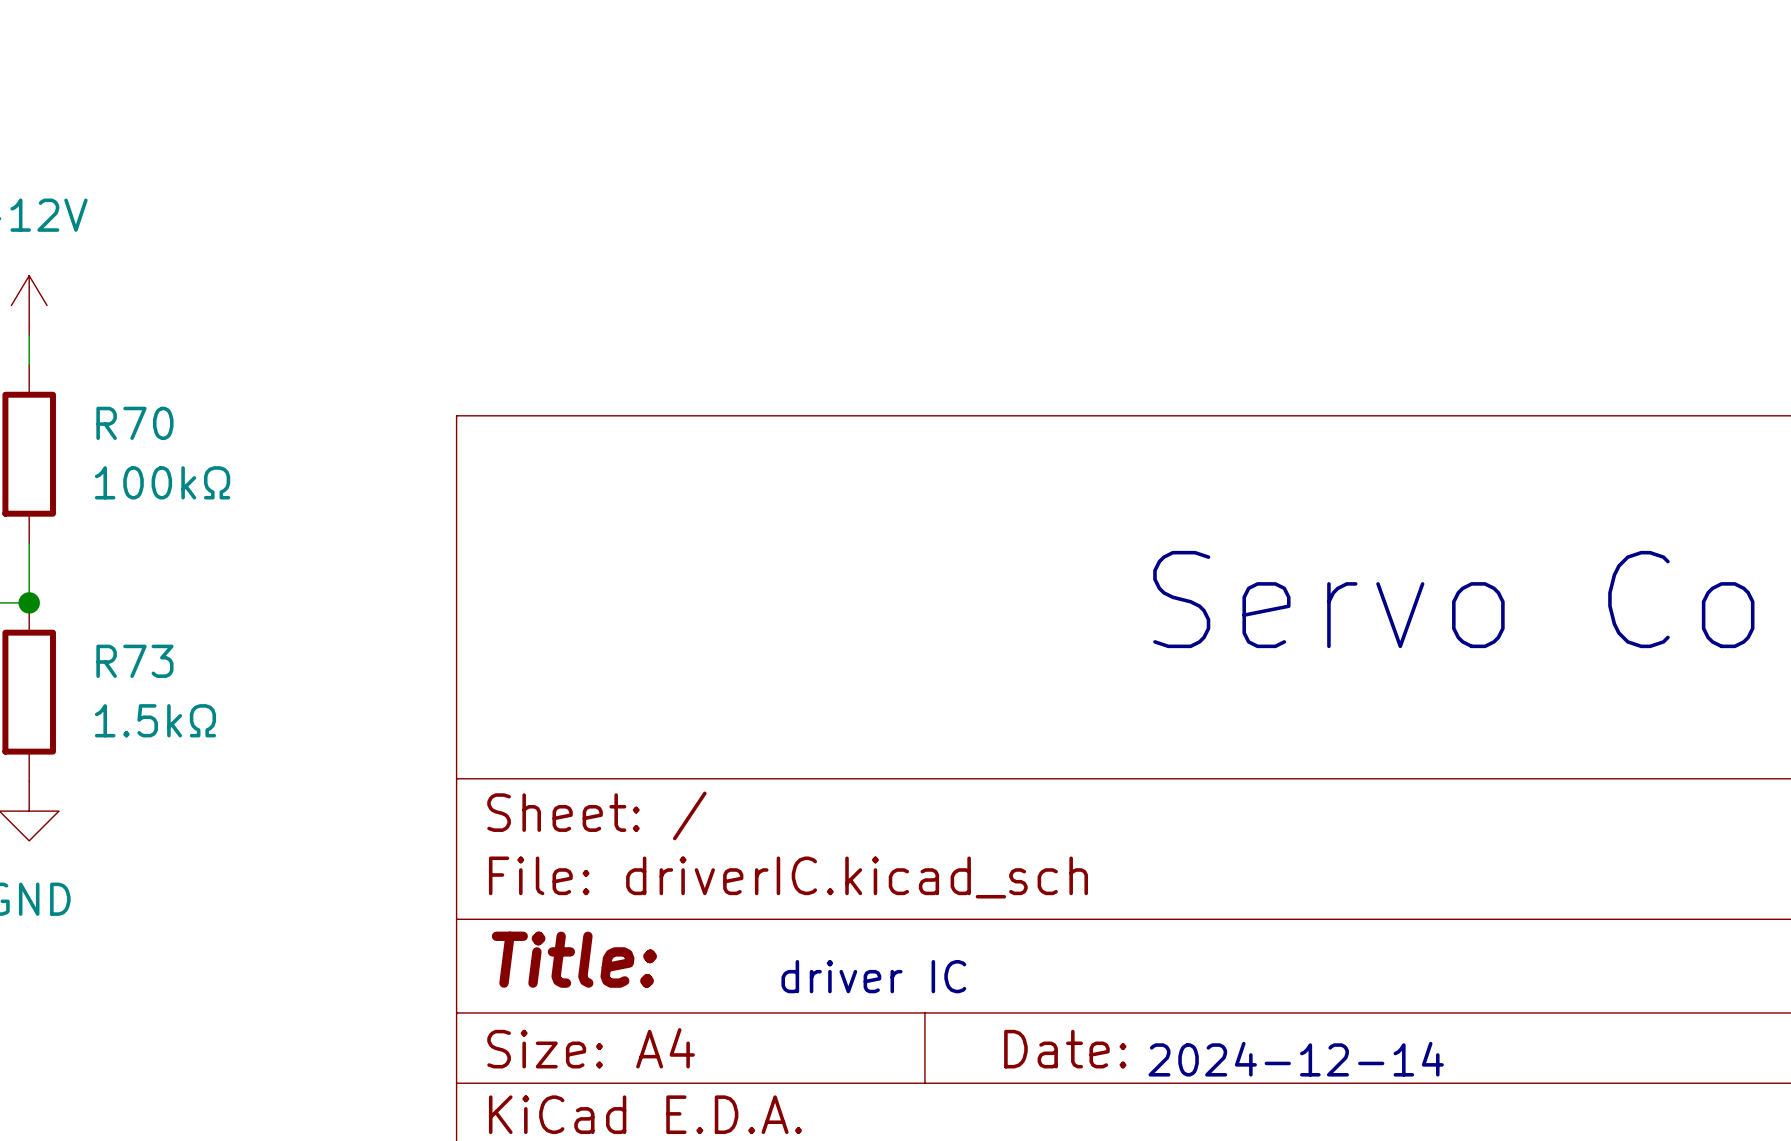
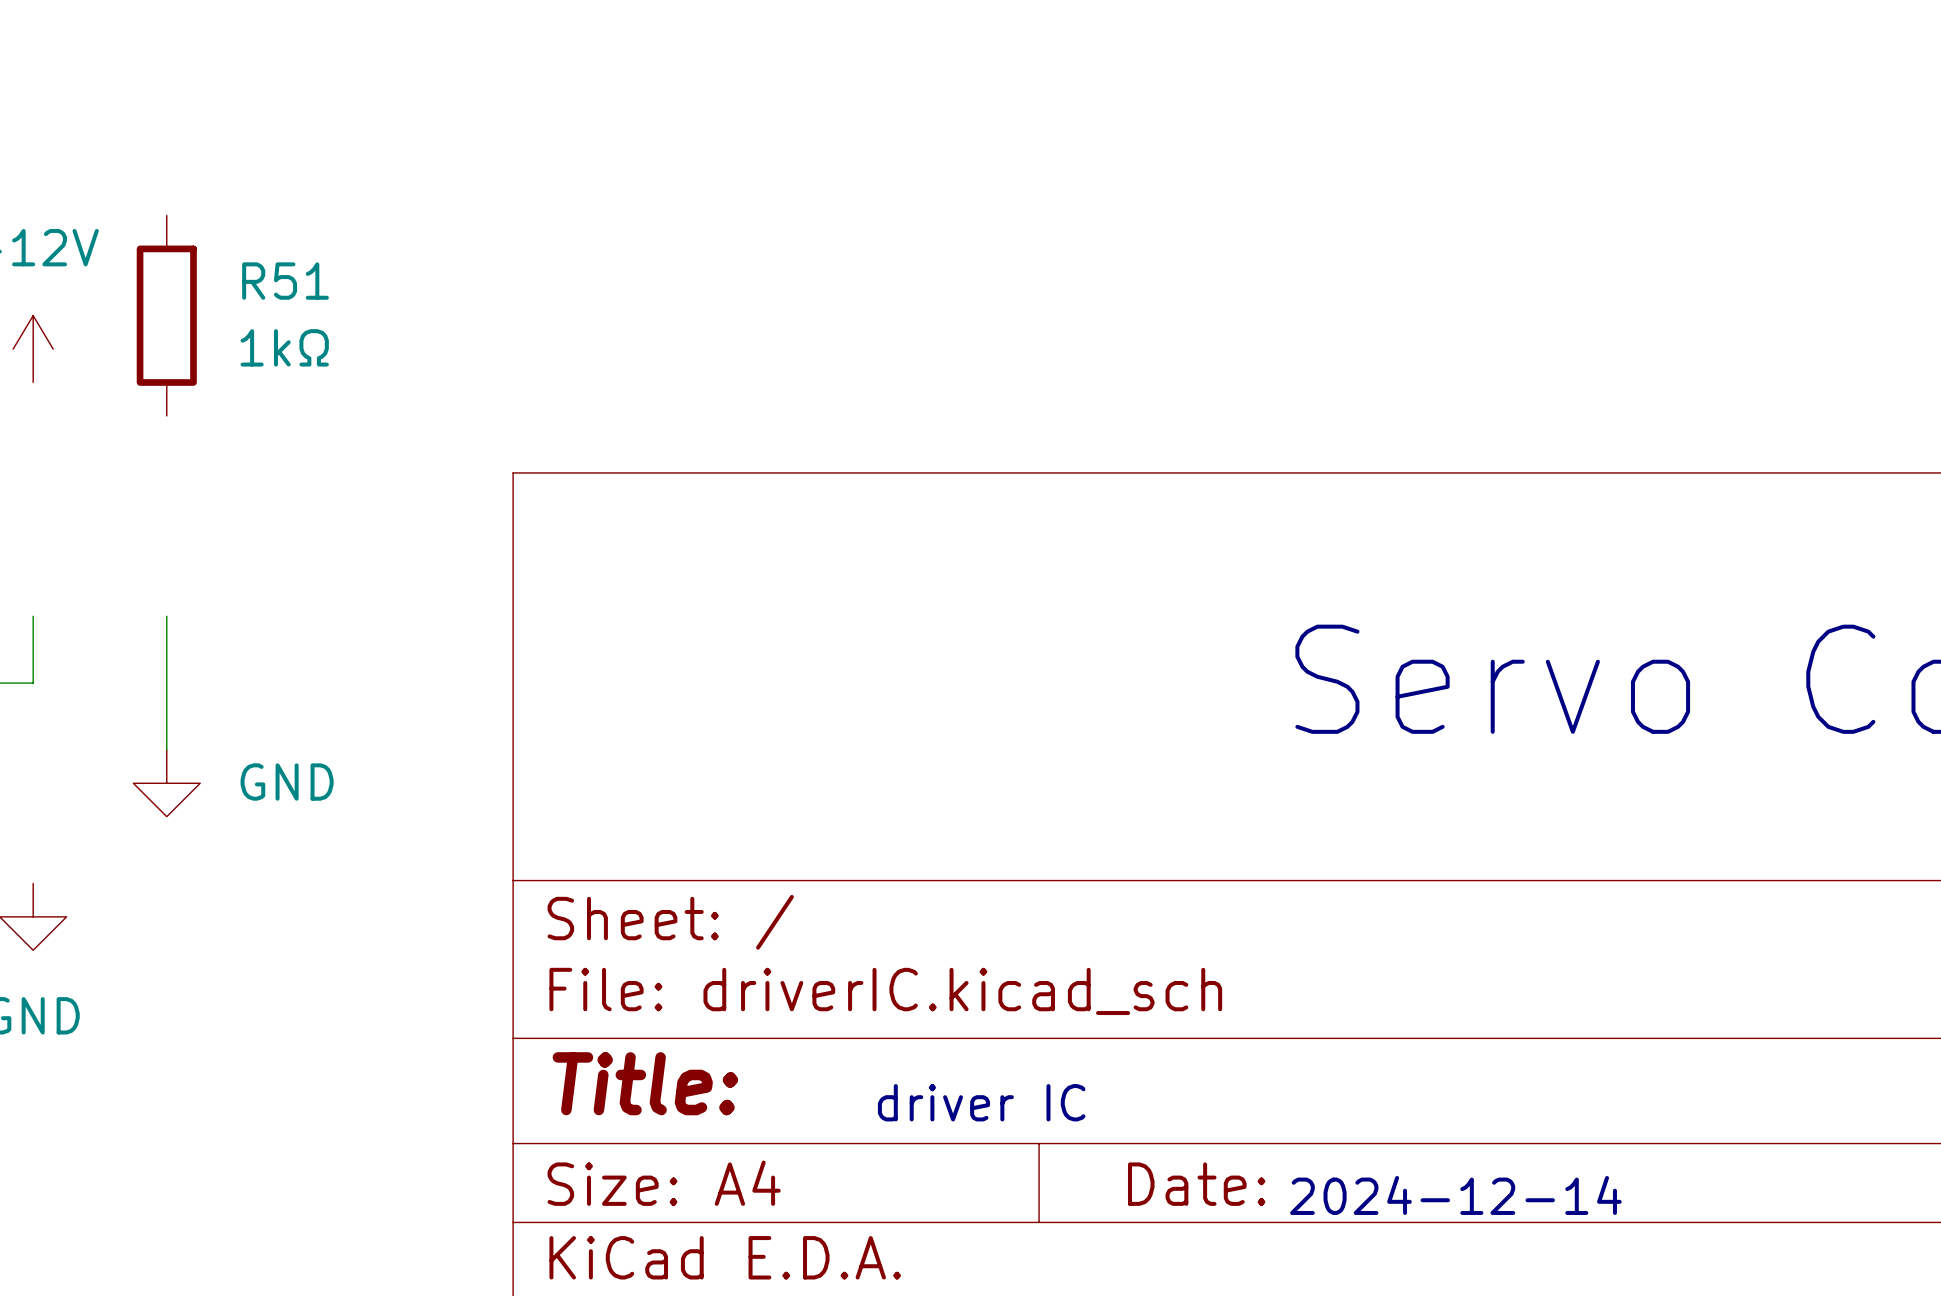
R51: none -> 1kΩ (166, 315)
wire: (29, 335) (29, 364) -> none
R70: 100kΩ (29, 454) -> none
wire: none -> (166, 616) (166, 749)
junction: (29, 602) -> none
R73: 1.5kΩ (29, 692) -> none
power symbol: none -> GND (166, 783)

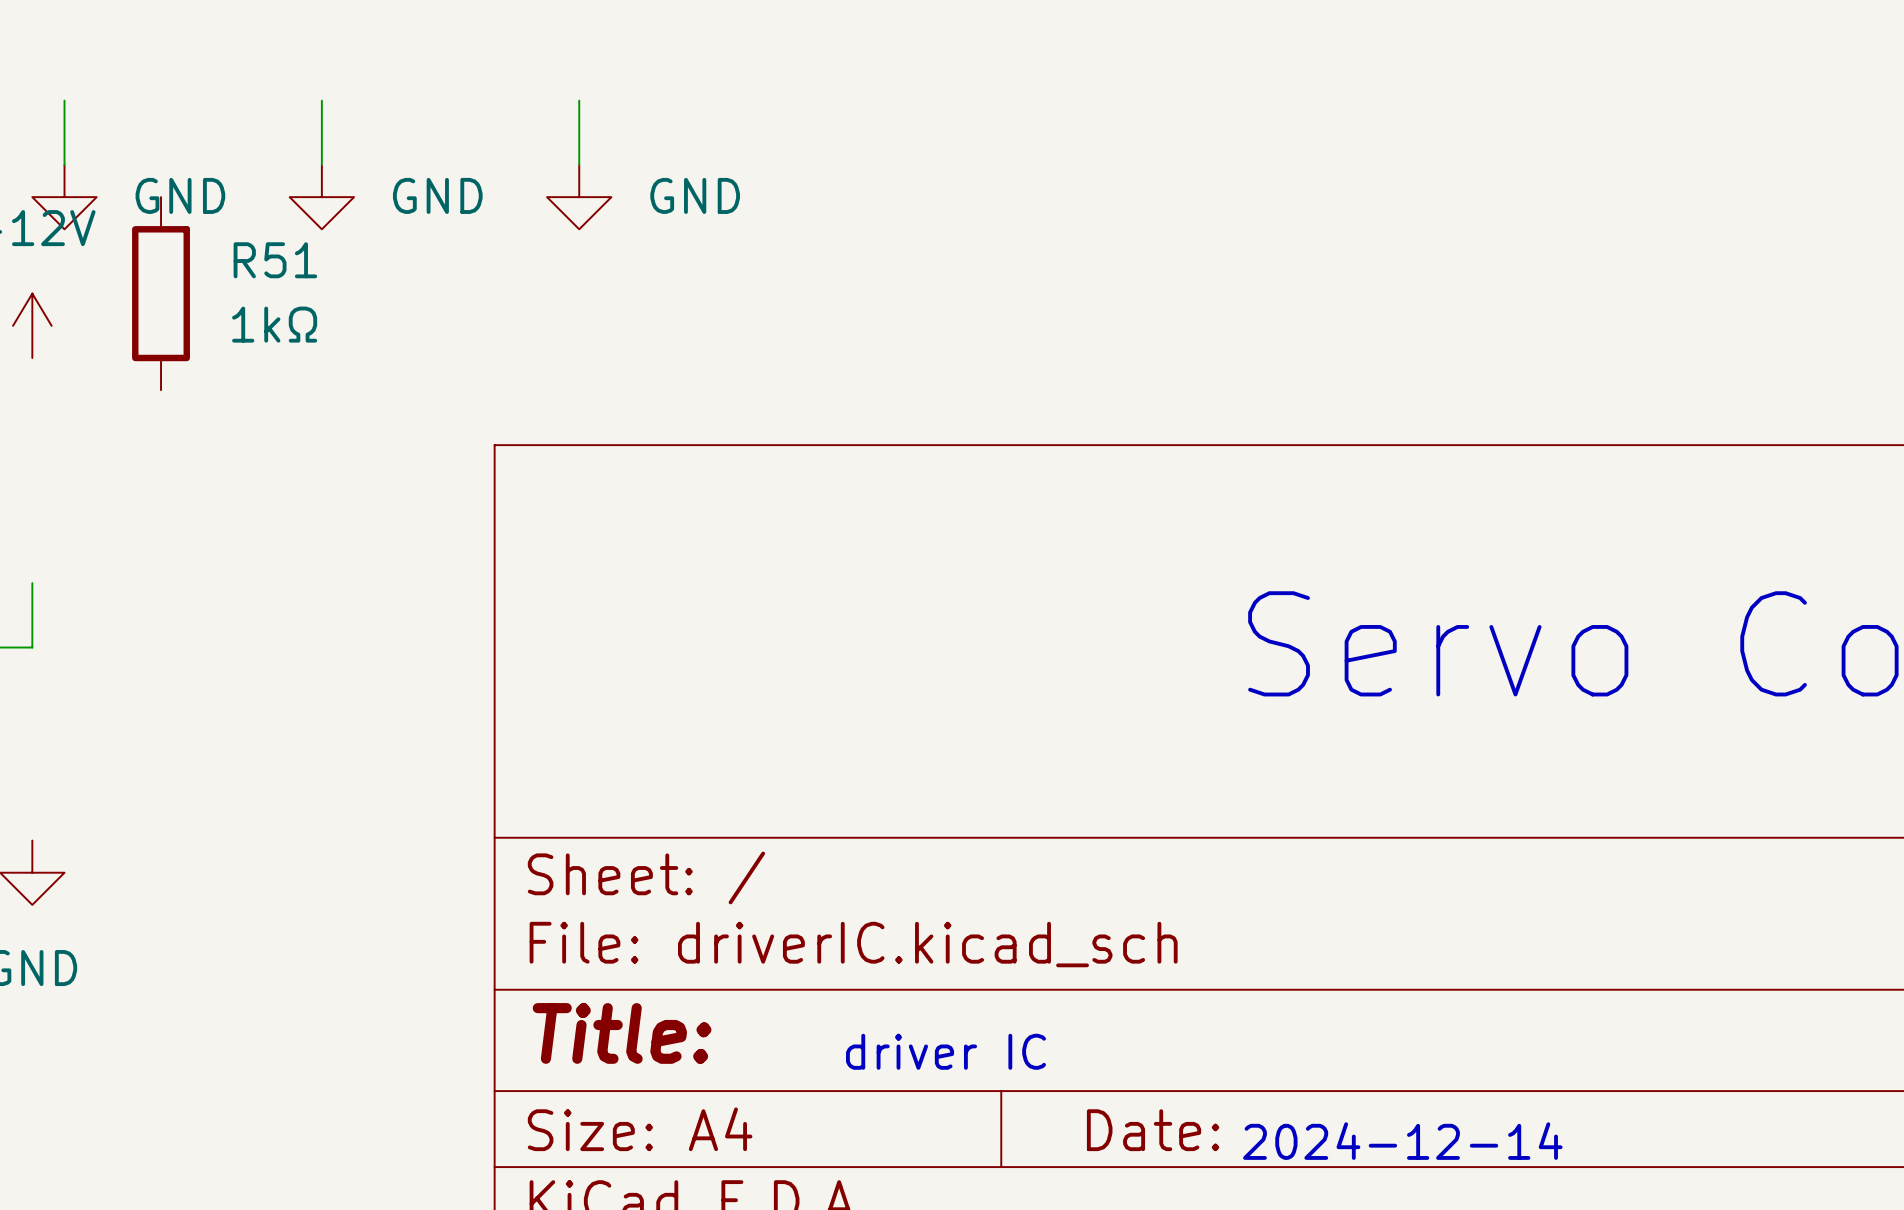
wire: none -> (64, 100) (64, 164)
wire: none -> (321, 100) (321, 164)
wire: none -> (579, 100) (579, 164)
power symbol: none -> GND (64, 197)
power symbol: none -> GND (321, 197)
power symbol: none -> GND (579, 197)
wire: (166, 616) (166, 749) -> none
power symbol: GND (166, 783) -> none

